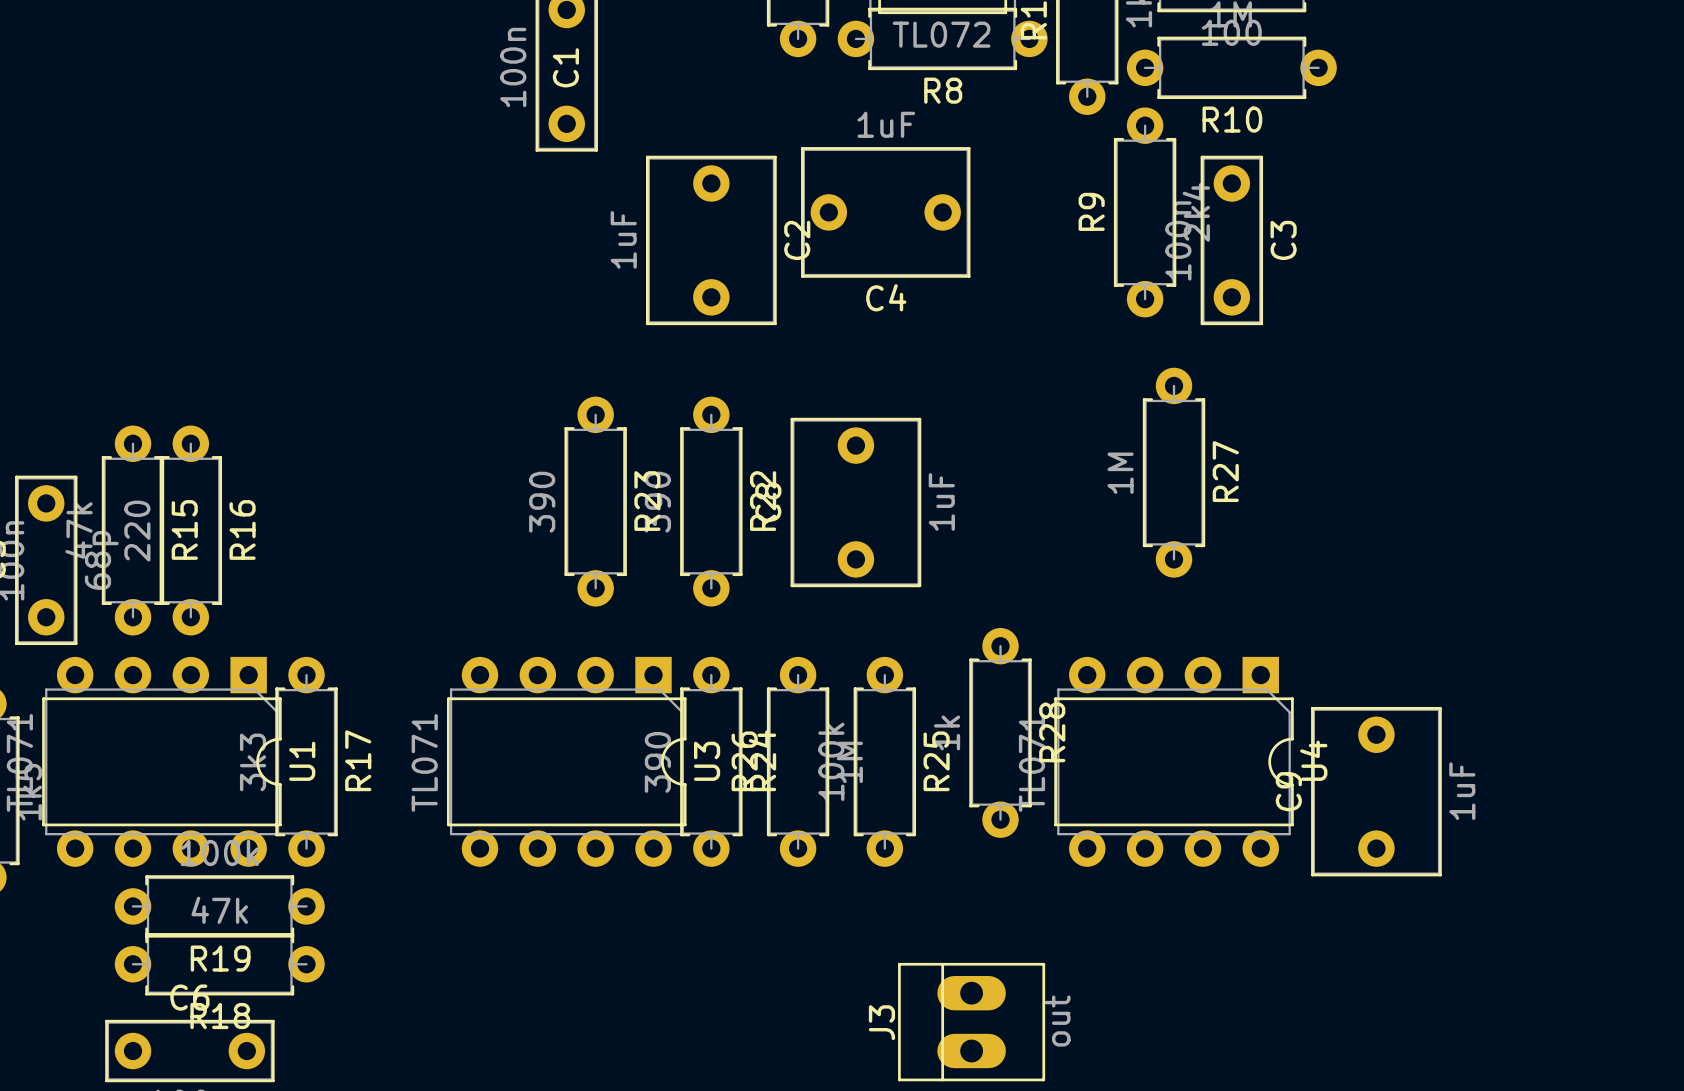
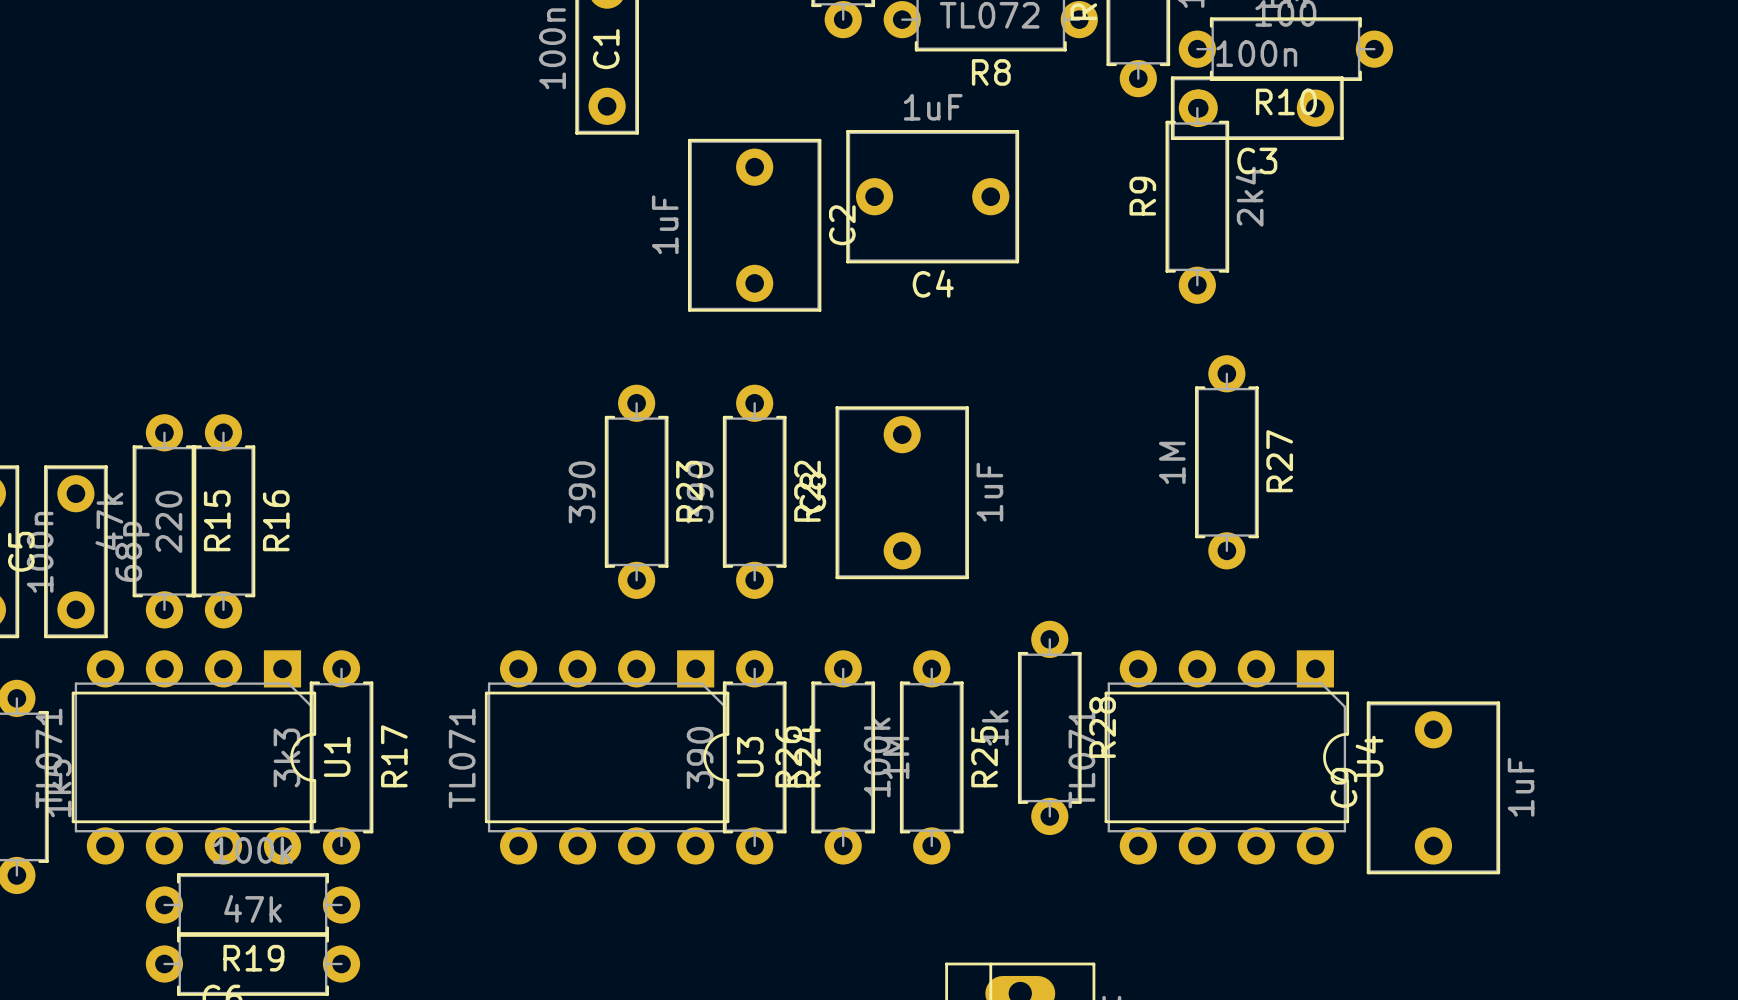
C3 rotation: 0° (1231, 240) -> 90° clockwise (1257, 108)
C3 position: (1231, 240) -> (1257, 108)

